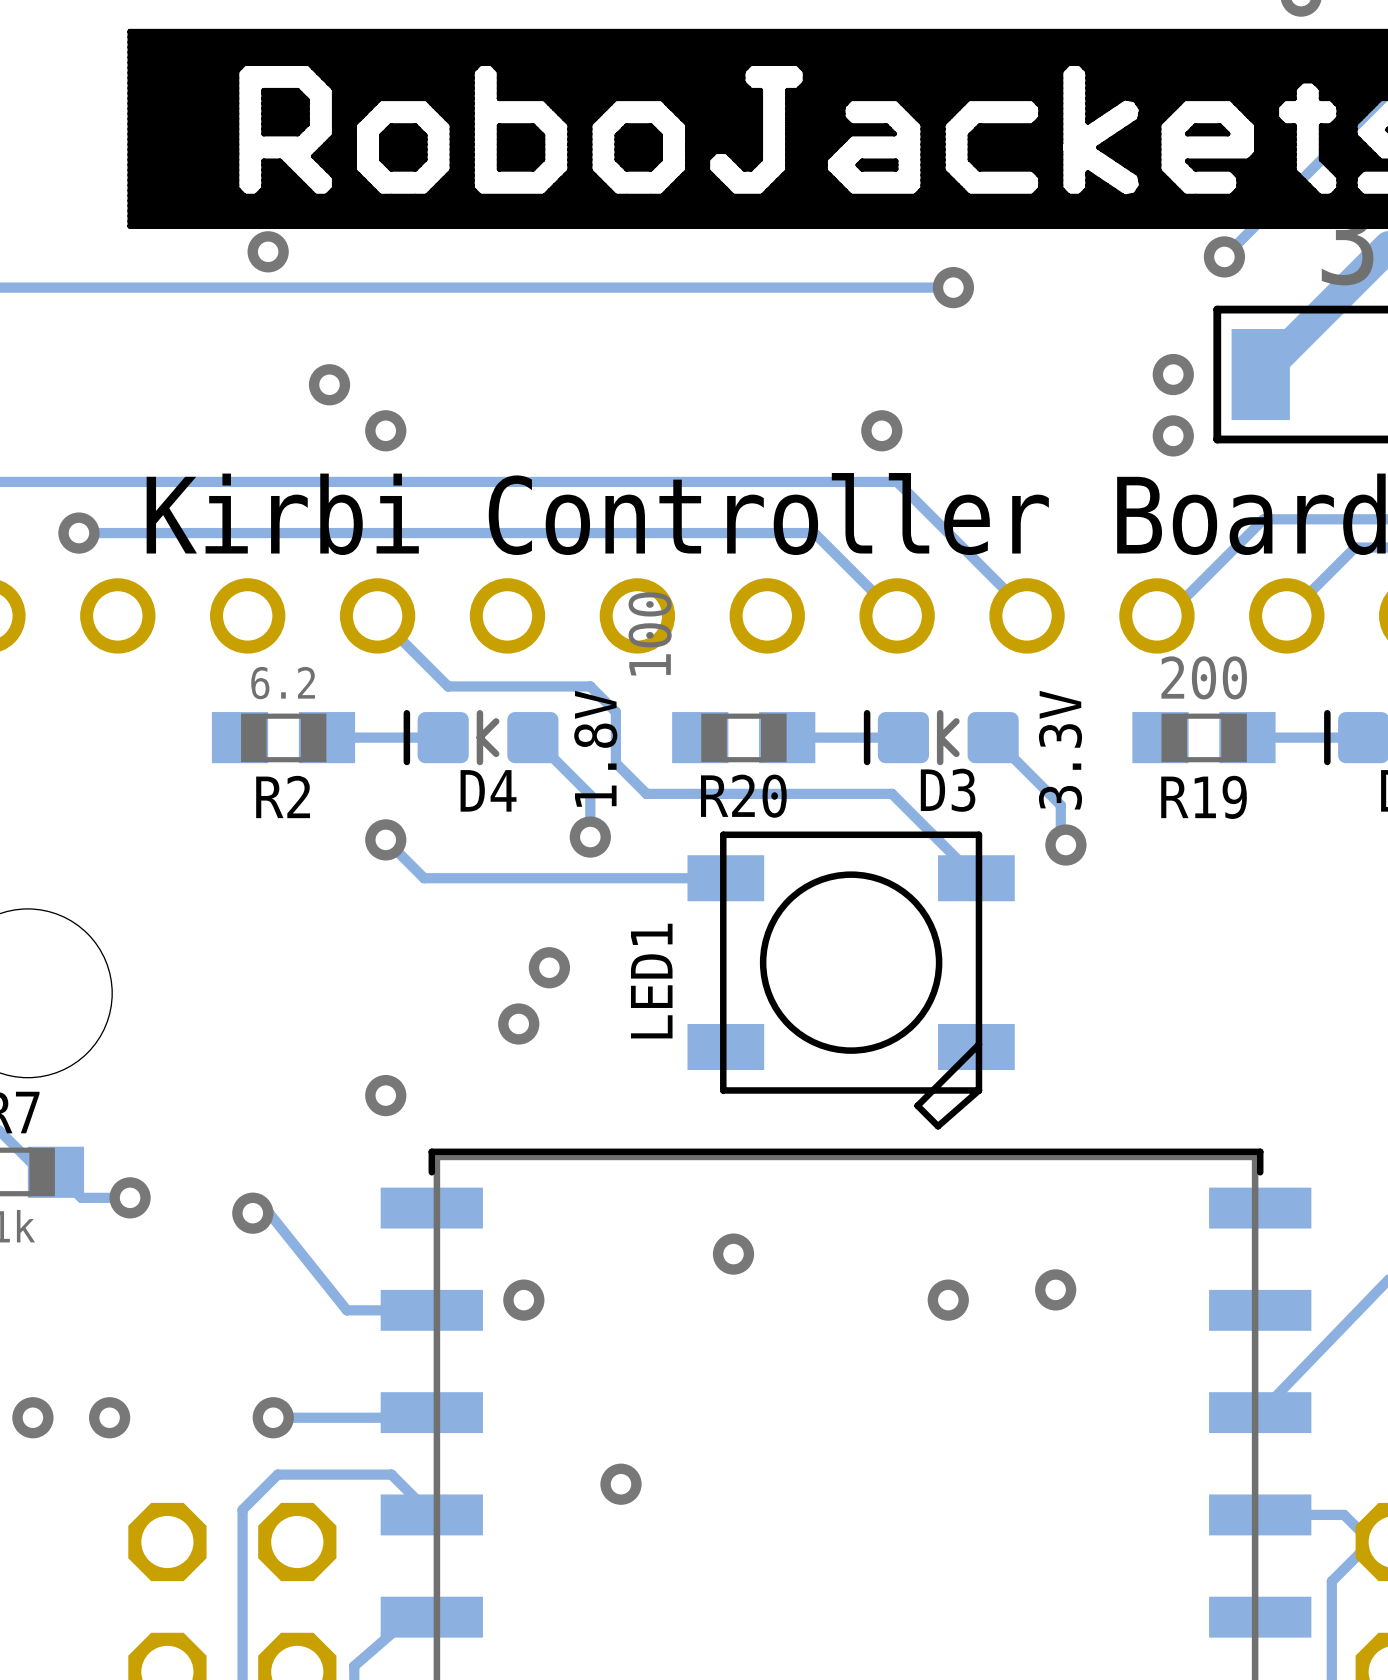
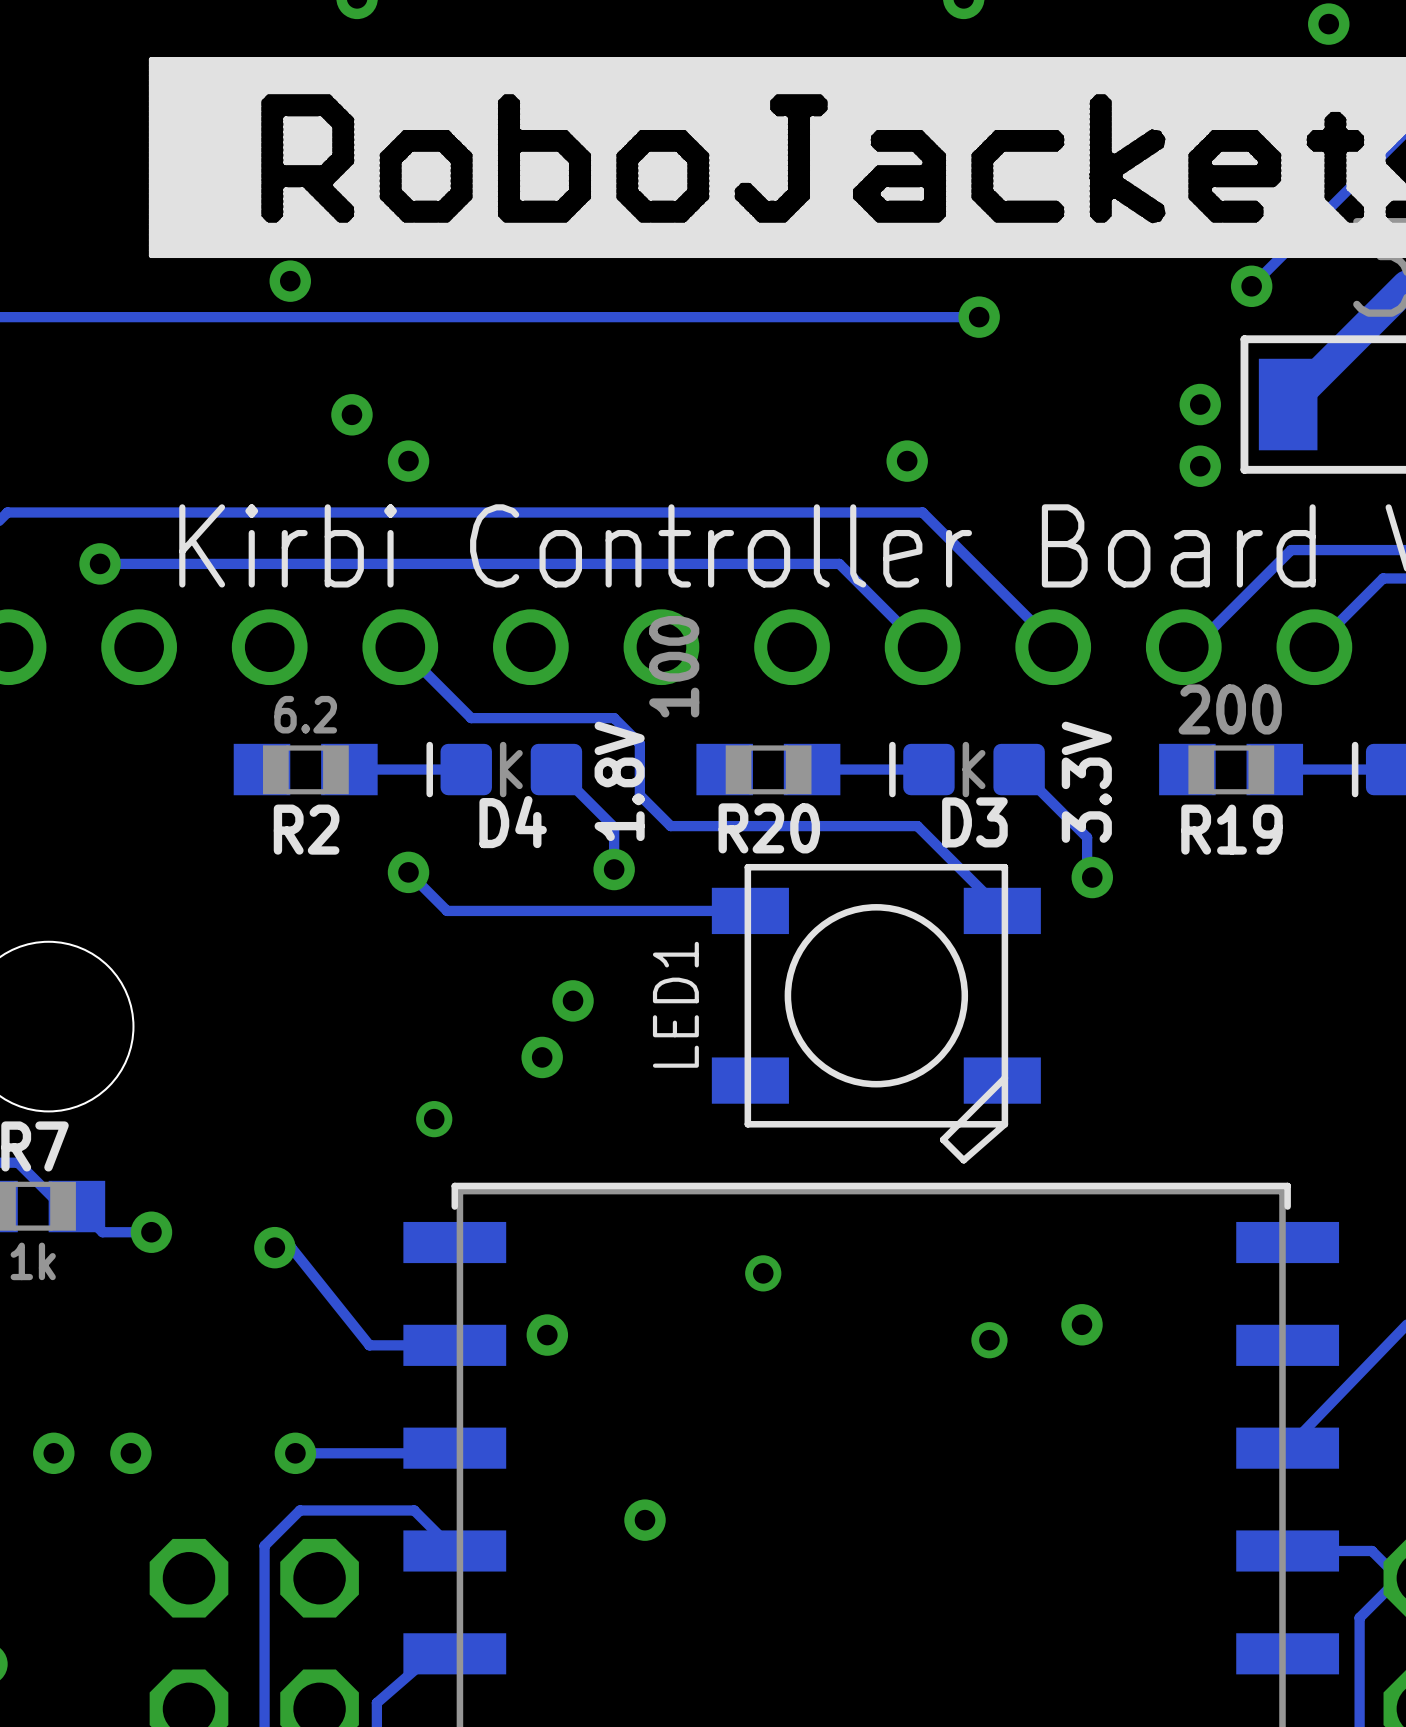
via position: (385, 1095) -> (434, 1119)
via position: (733, 1254) -> (763, 1273)
via position: (948, 1300) -> (989, 1340)

